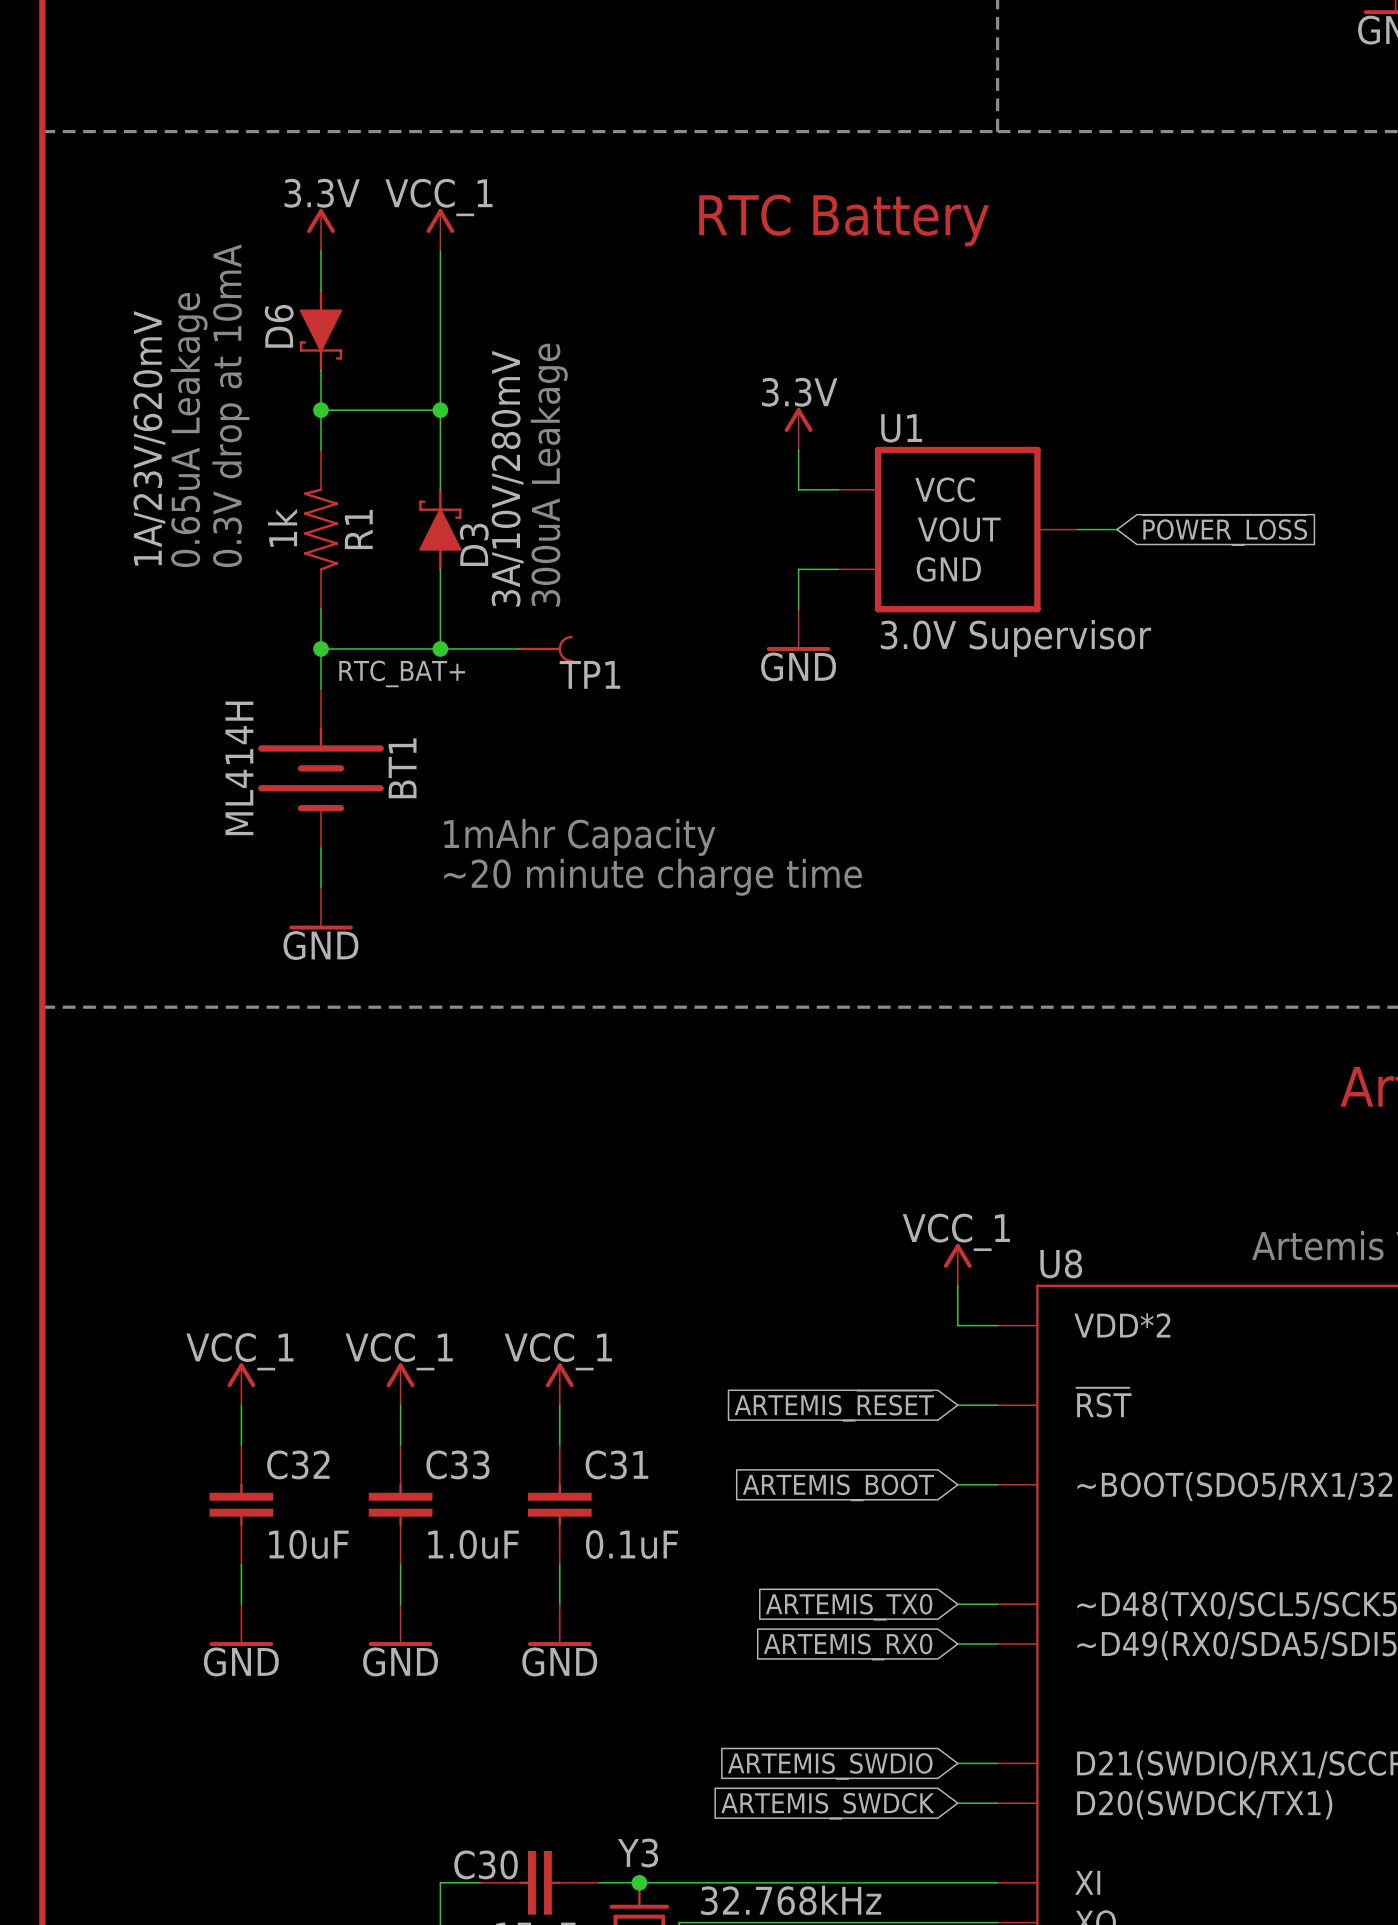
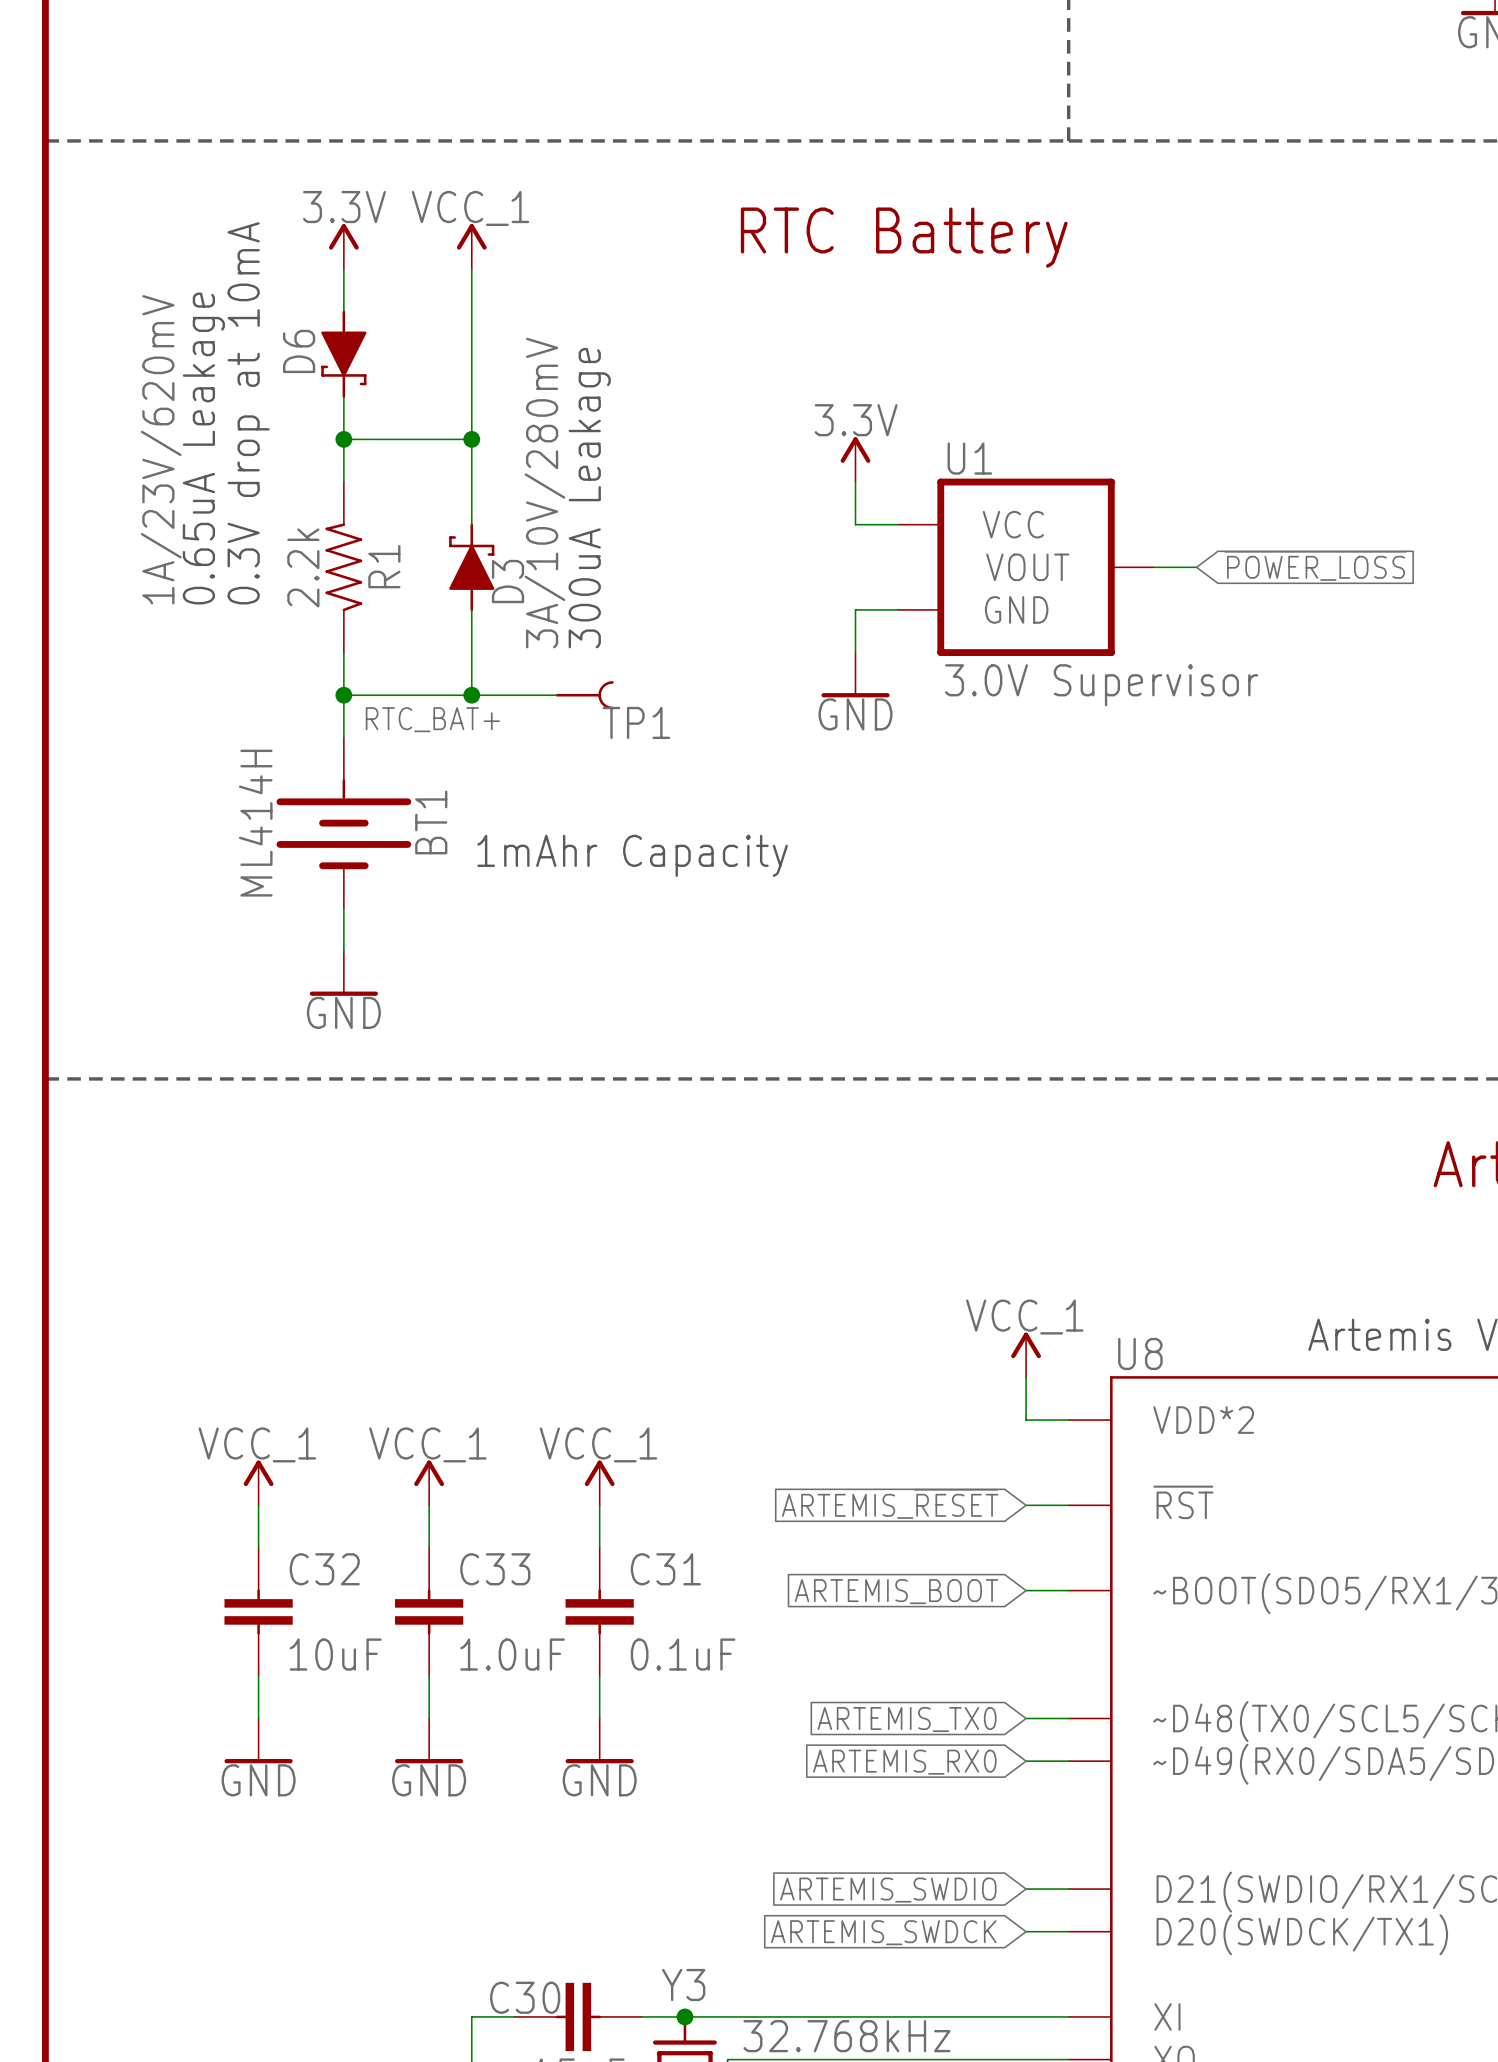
R1 value: 1k (282, 527) -> 2.2k (303, 567)
text position: 1mAhr Capacity (579, 837) -> 1mAhr Capacity (632, 855)
text: ~20 minute charge time (652, 877) -> none

